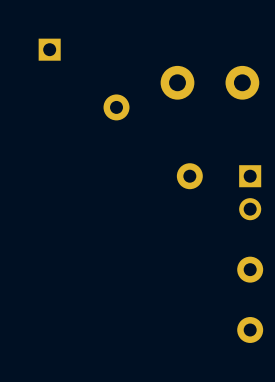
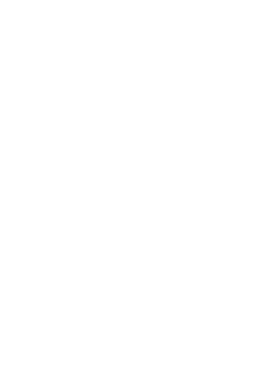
part: (49, 49) -> none
part: (209, 82) -> none
part: (116, 107) -> none
part: (189, 176) -> none
part: (250, 192) -> none
part: (250, 269) -> none
part: (250, 329) -> none

